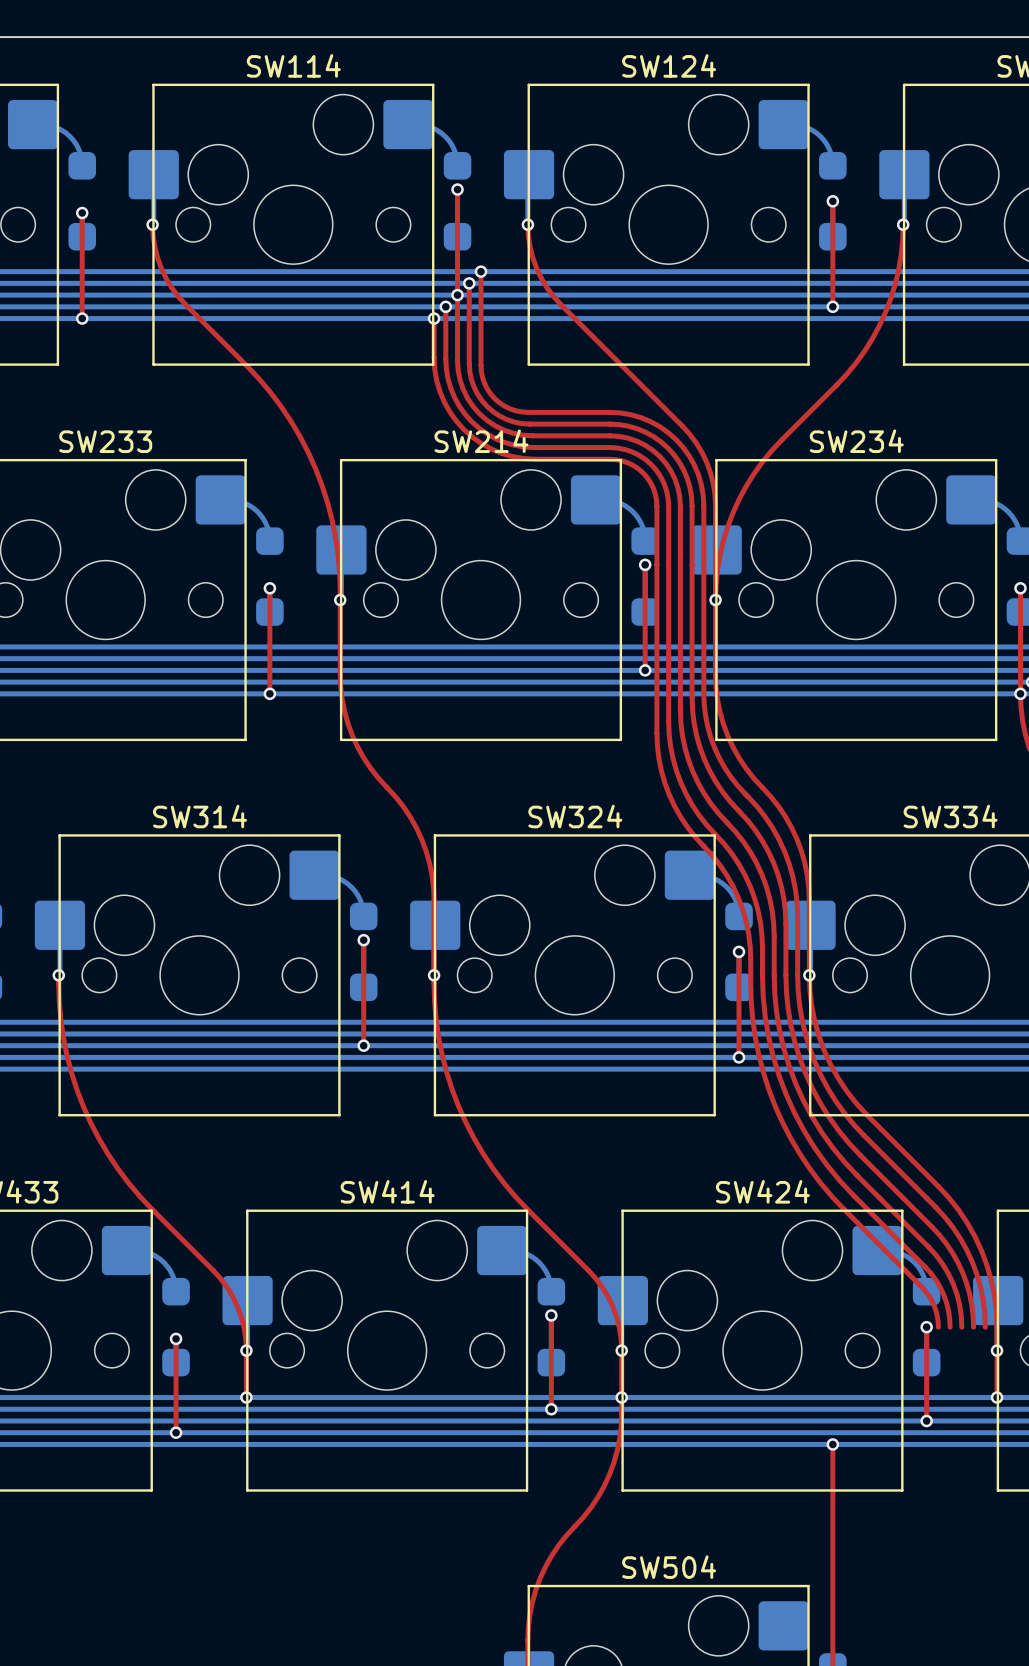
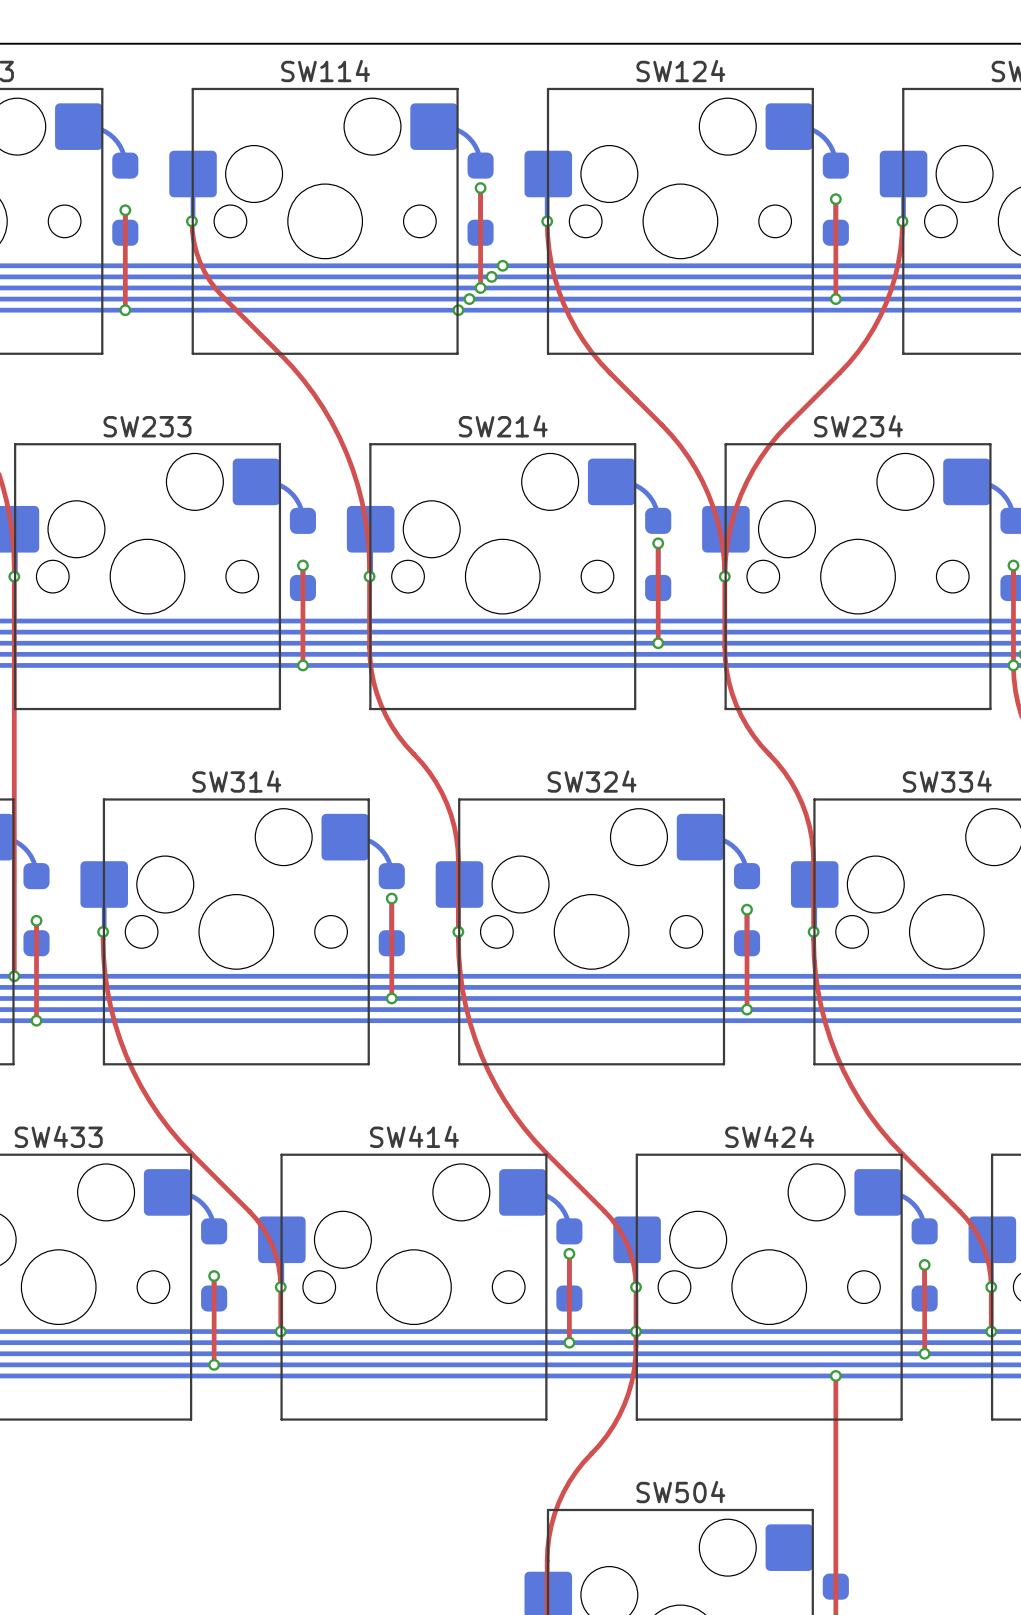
top track: (527, 224) (532, 257) (541, 278) (553, 296) (682, 426) (702, 452) (710, 473) (715, 495) (715, 600) -> (547, 221) (551, 263) (558, 290) (569, 316) (583, 340) (600, 362) (671, 435) (696, 469) (708, 494) (717, 521) (722, 548) (724, 576)
top track: (480, 271) (481, 371) (484, 383) (494, 398) (509, 408) (521, 411) (610, 412) (640, 417) (668, 432) (683, 447) (694, 465) (701, 485) (703, 506) (703, 693) (705, 715) (714, 748) (724, 767) (765, 816) (779, 839) (789, 864) (797, 903) (799, 1004) (809, 1048) (821, 1075) (844, 1113) (935, 1207) (960, 1238) (976, 1274) (983, 1300) (985, 1327) -> none
top track: (469, 283) (469, 371) (477, 393) (492, 411) (506, 419) (521, 423) (610, 424) (637, 428) (661, 442) (674, 455) (683, 470) (690, 487) (692, 506) (692, 697) (694, 722) (699, 747) (709, 770) (722, 792) (762, 840) (778, 874) (785, 911) (788, 1008) (799, 1057) (812, 1088) (838, 1130) (860, 1155) (932, 1227) (952, 1253) (962, 1272) (969, 1294) (973, 1327) -> none
top track: (457, 295) (457, 360) (460, 380) (473, 406) (486, 420) (503, 430) (522, 435) (610, 435) (628, 438) (645, 445) (659, 456) (675, 479) (680, 506) (680, 709) (682, 734) (688, 759) (697, 782) (710, 803) (750, 852) (766, 886) (773, 923) (776, 1012) (789, 1066) (812, 1116) (832, 1147) (857, 1175) (928, 1247) (942, 1264) (956, 1294) (961, 1327) -> none
top track: (445, 306) (445, 359) (448, 378) (459, 406) (479, 428) (505, 442) (524, 447) (610, 447) (625, 449) (645, 459) (660, 476) (666, 491) (668, 506) (668, 721) (670, 746) (676, 770) (686, 794) (699, 815) (738, 864) (754, 898) (761, 935) (765, 1015) (778, 1075) (804, 1131) (826, 1164) (853, 1195) (935, 1279) (946, 1302) (950, 1327) -> none
top track: (434, 318) (434, 368) (439, 391) (456, 420) (472, 437) (491, 449) (524, 458) (622, 460) (638, 468) (650, 482) (655, 494) (656, 506) (656, 733) (658, 758) (664, 782) (674, 805) (687, 827) (727, 875) (742, 910) (750, 947) (751, 1001) (755, 1037) (768, 1089) (782, 1122) (809, 1168) (832, 1196) (925, 1291) (934, 1305) (938, 1327) -> none
top track: (809, 975) (814, 1021) (824, 1051) (838, 1078) (867, 1115) (949, 1197) (975, 1237) (987, 1266) (994, 1296) (997, 1350) -> (813, 931) (815, 973) (821, 1006) (830, 1039) (843, 1071) (860, 1100) (879, 1128) (973, 1227) (986, 1256) (991, 1287)

